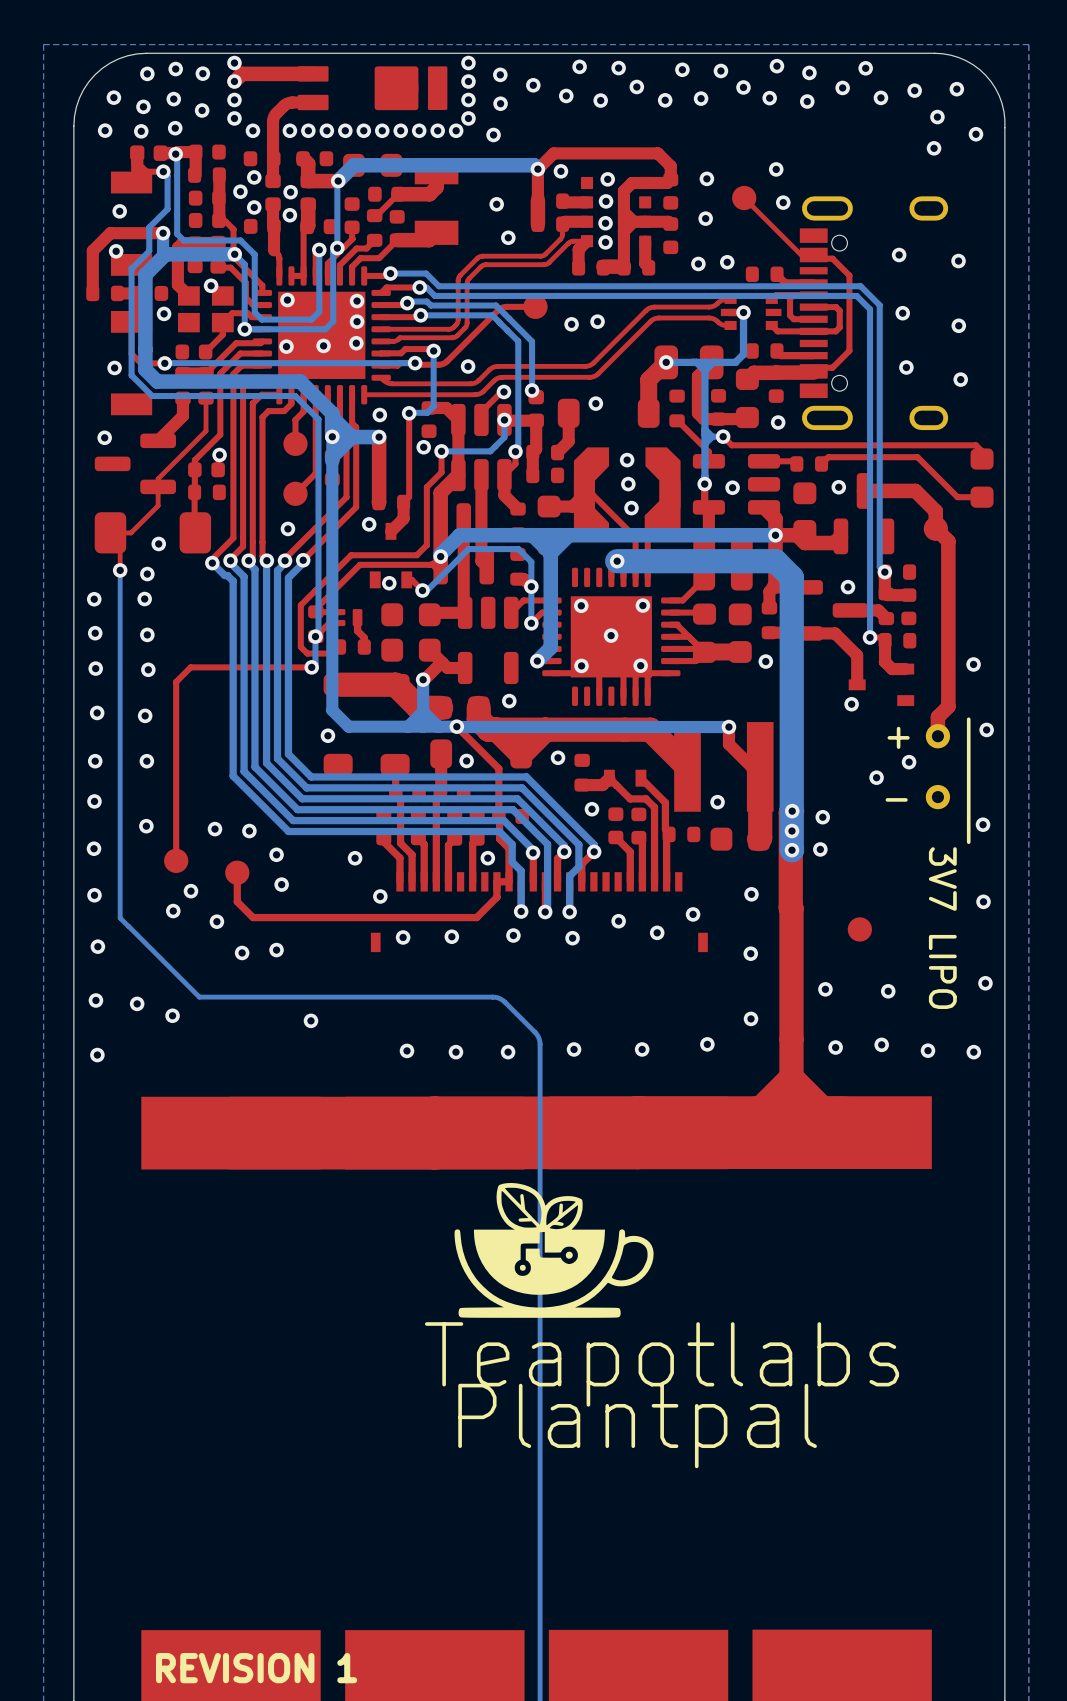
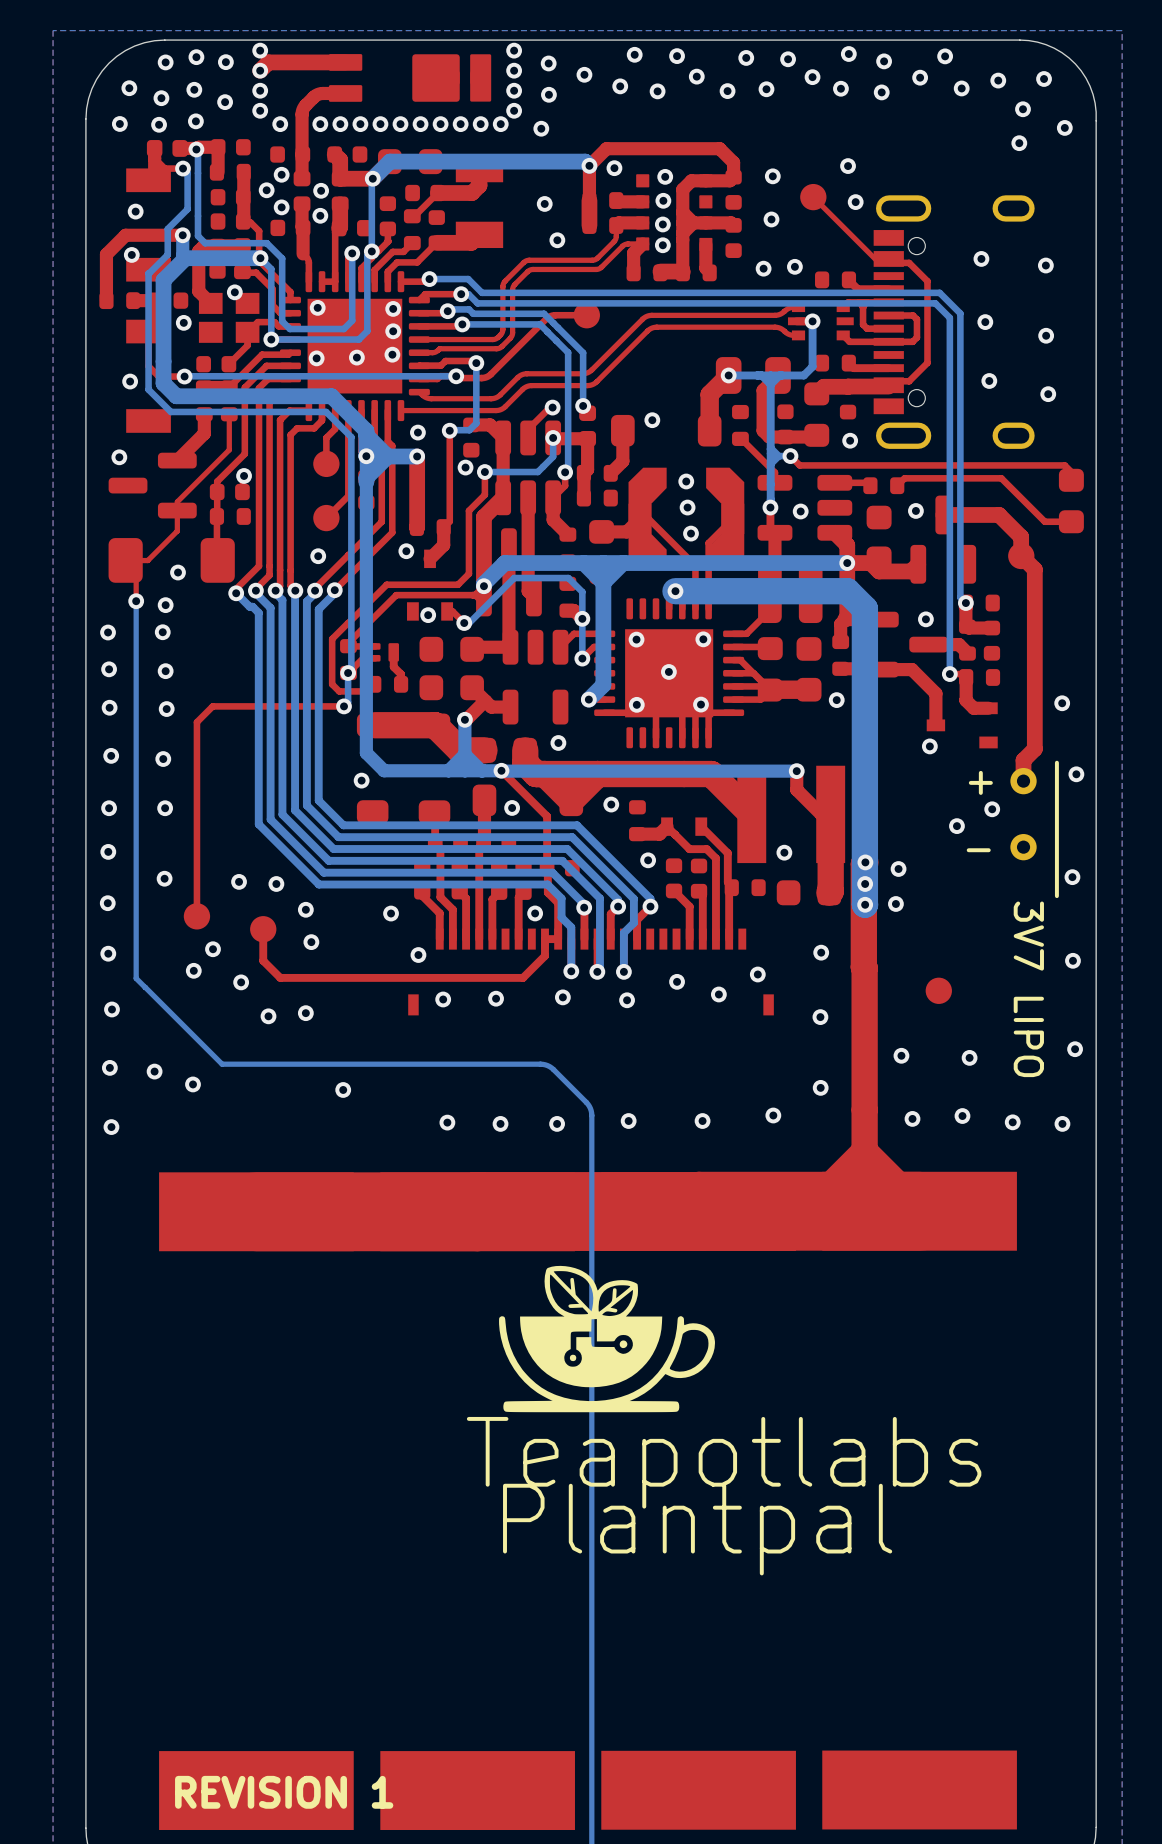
top track: (717, 303) (710, 306) (648, 308) (588, 365) (496, 366) (490, 369) (475, 382) (447, 383) -> (784, 311) (774, 315) (648, 315) (589, 372) (582, 373) (523, 374) (499, 396) (491, 398)
via: (597, 321) -> none
via: (571, 324) -> none
top track: (726, 325) (710, 318) (655, 318) (594, 376) (501, 377) (494, 380) (479, 393) (451, 394) -> (794, 335) (774, 327) (653, 327) (594, 383) (587, 385) (528, 386) (503, 407) (495, 410)
via: (468, 366) -> none

